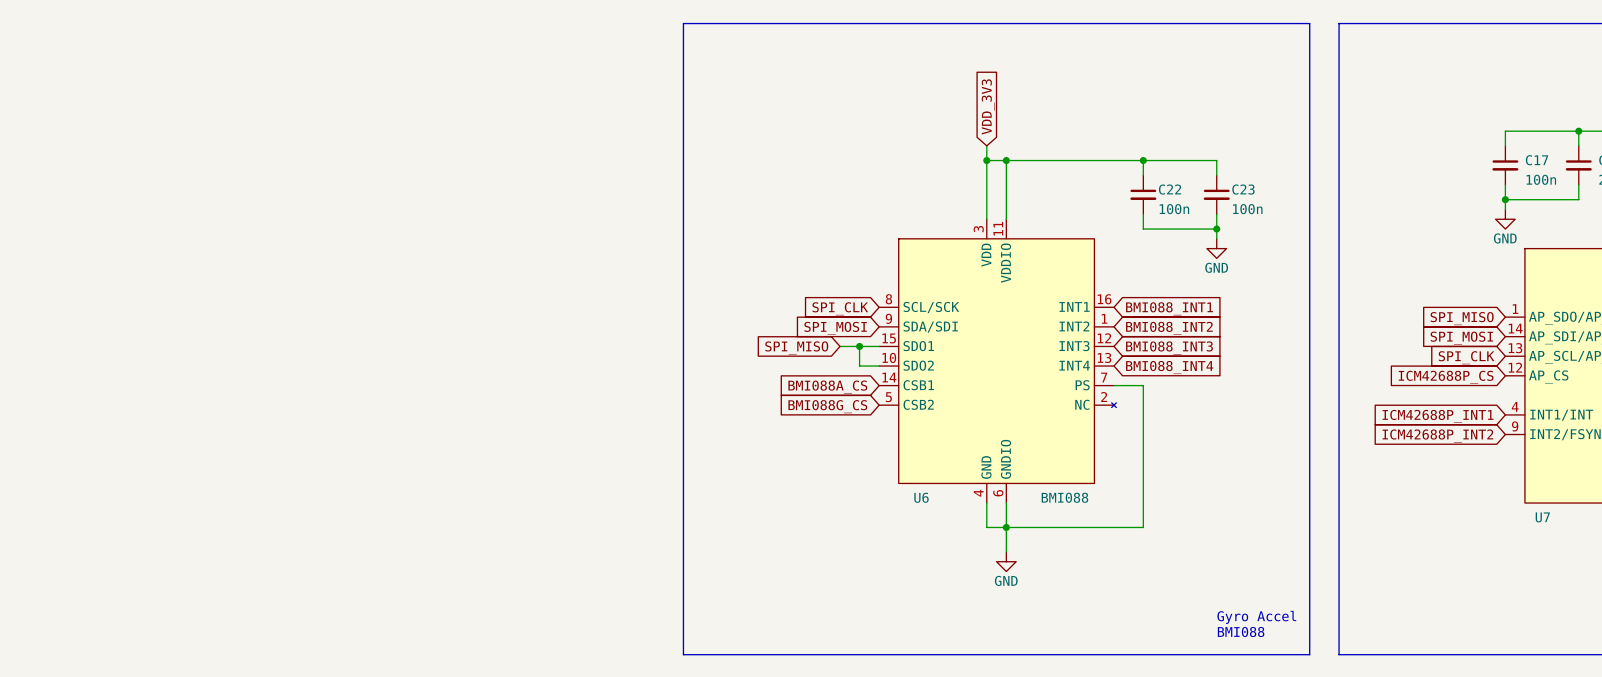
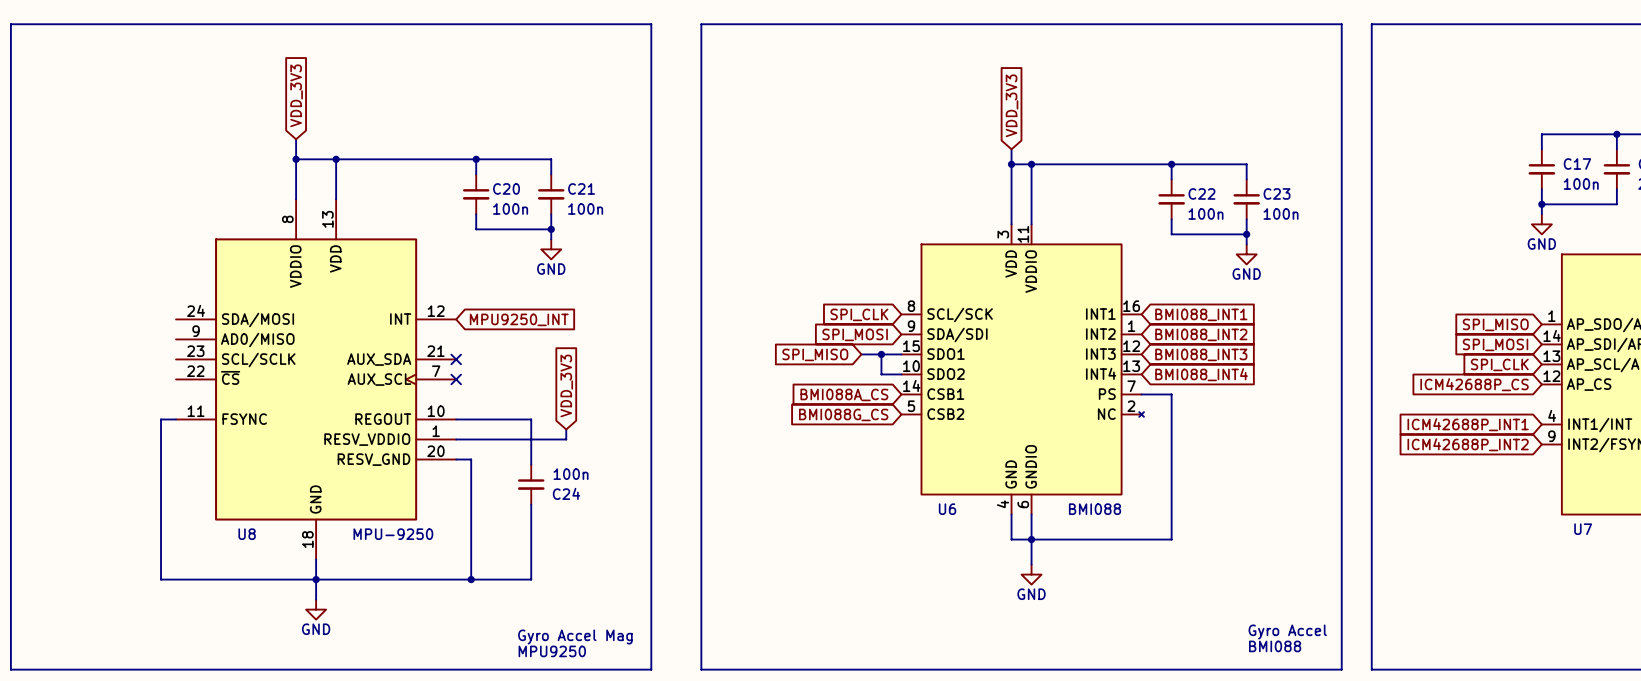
line: none -> (10, 24) (651, 24) (651, 669) (10, 669) (10, 24)
global label: none -> VDD_3V3 (296, 95)
wire: none -> (296, 139) (296, 199)
wire: none -> (296, 159) (551, 159) (551, 174)
junction: none -> (296, 159)
wire: none -> (336, 159) (336, 199)
junction: none -> (336, 159)
wire: none -> (476, 159) (476, 174)
junction: none -> (476, 159)
C20: none -> 100n (476, 194)
C21: none -> 100n (551, 194)
wire: none -> (476, 214) (476, 229) (551, 229)
wire: none -> (551, 214) (551, 239)
junction: none -> (551, 229)
power symbol: none -> GND (551, 249)
global label: none -> MPU9250_INT (519, 319)
no-connect mark: none -> (456, 359)
U8: none -> MPU-9250 (316, 379)
no-connect mark: none -> (456, 379)
global label: none -> VDD_3V3 (566, 385)
wire: none -> (176, 419) (161, 419) (161, 579) (531, 579) (531, 504)
wire: none -> (456, 419) (531, 419) (531, 464)
wire: none -> (566, 429) (566, 439) (456, 439)
wire: none -> (456, 459) (471, 459) (471, 579)
C24: none -> 100n (531, 484)
wire: none -> (316, 559) (316, 599)
junction: none -> (316, 579)
junction: none -> (471, 579)
power symbol: none -> GND (316, 609)
text: none -> Gyro Accel Mag (575, 636)
text: none -> MPU9250 (552, 651)

